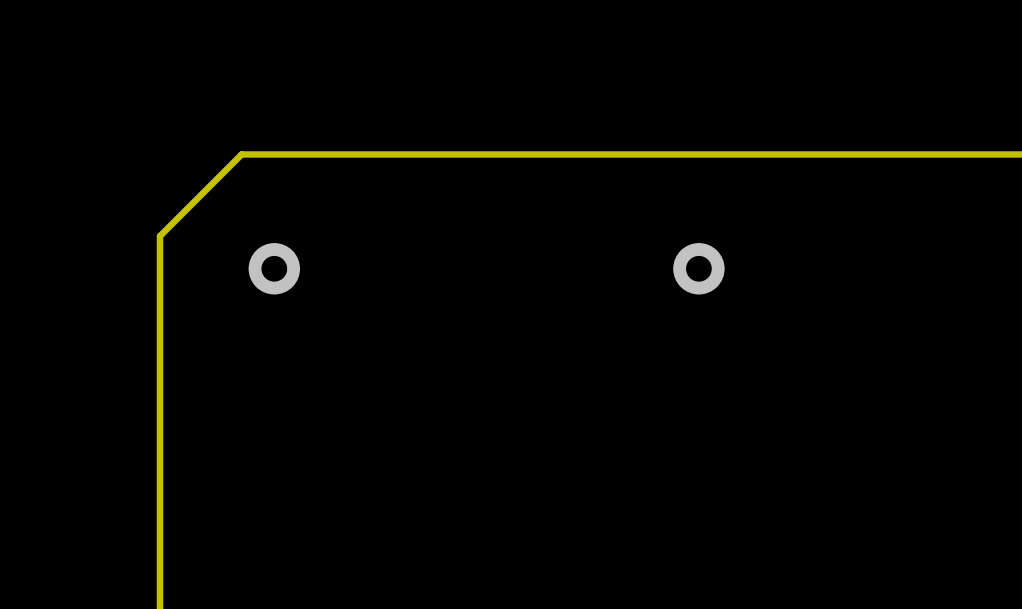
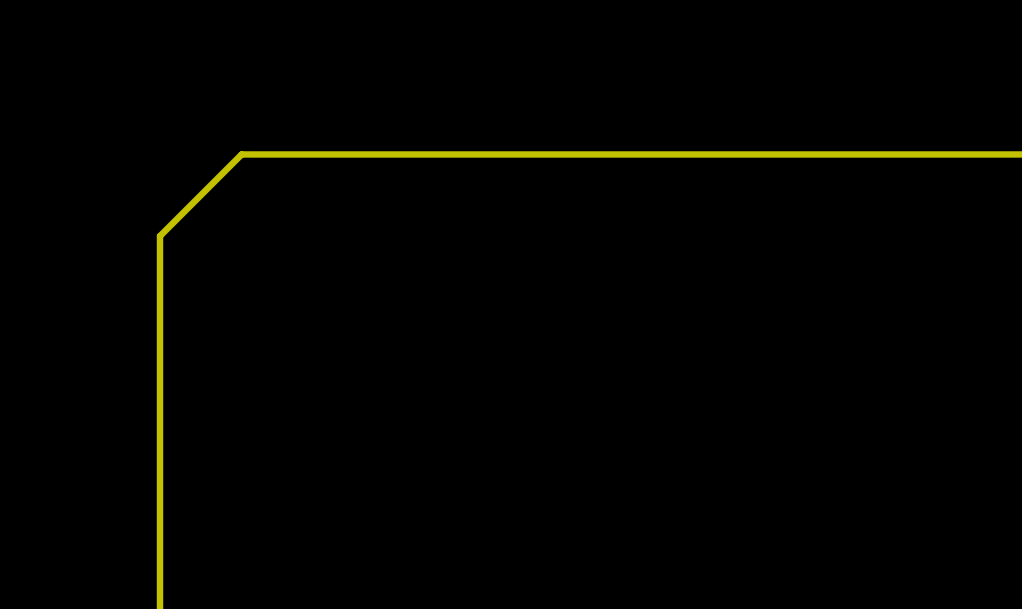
via: (274, 268) -> none
via: (698, 268) -> none

